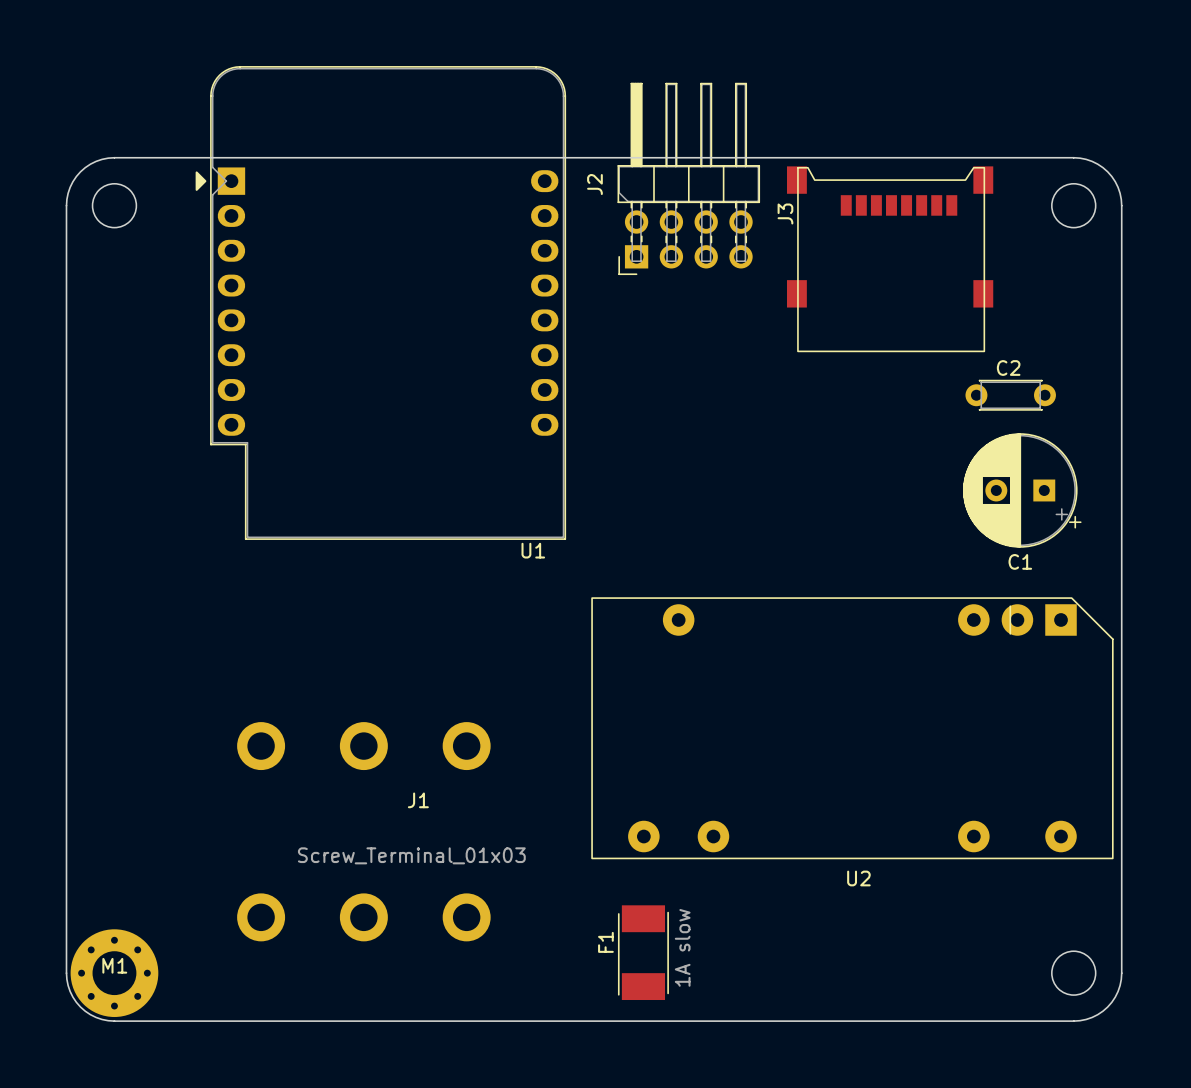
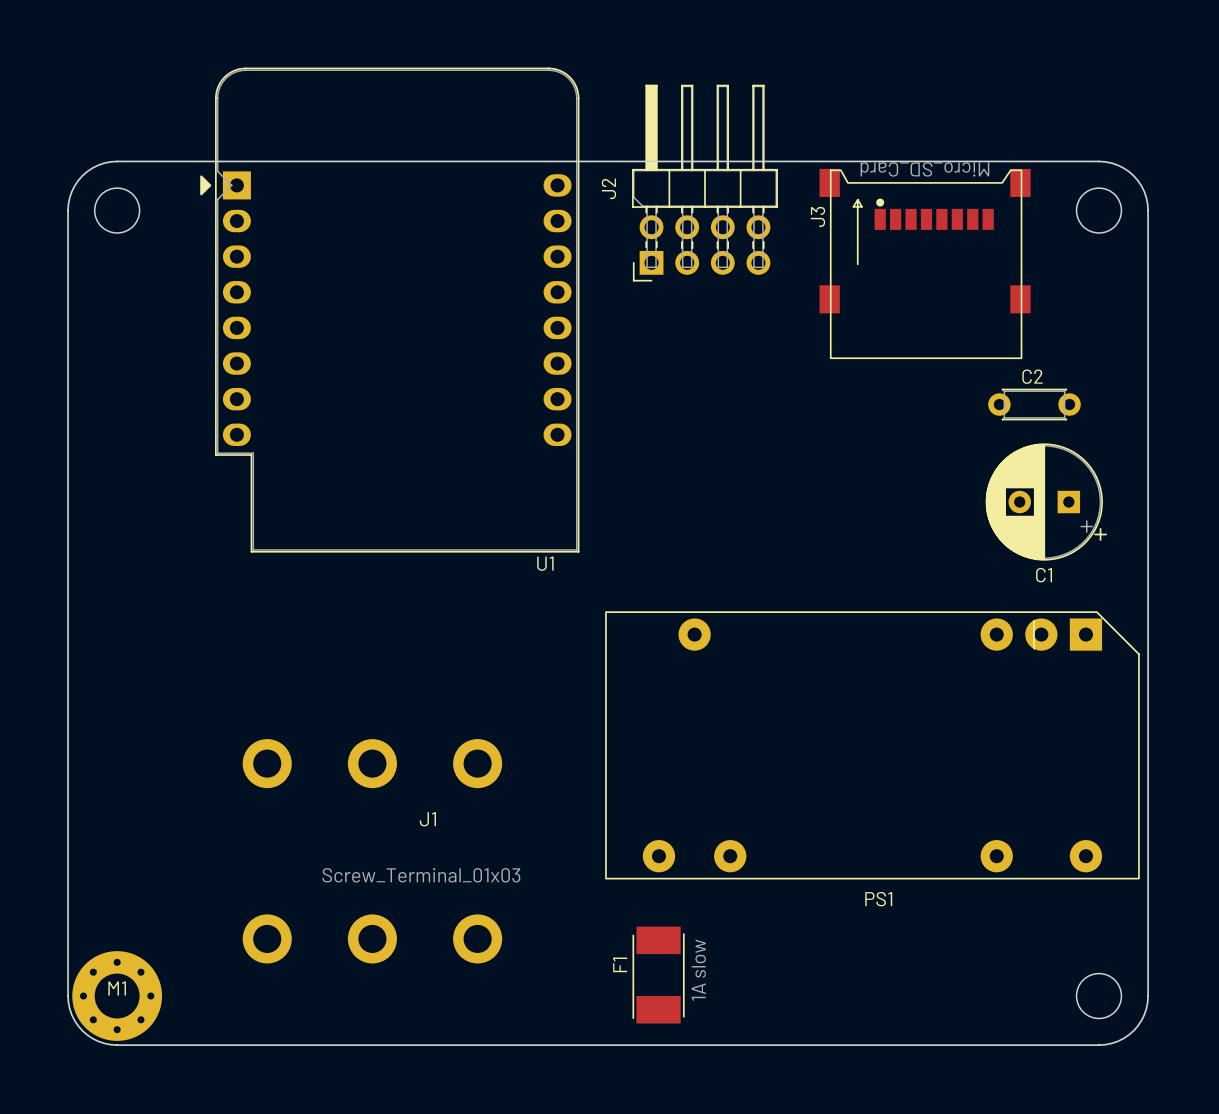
J3 value: none -> Micro_SD_Card (924, 169)
J3 footprint: [786, 166, 994, 353] -> [819, 168, 1031, 360]
U2 name: U2 (858, 878) -> PS1 (878, 899)

